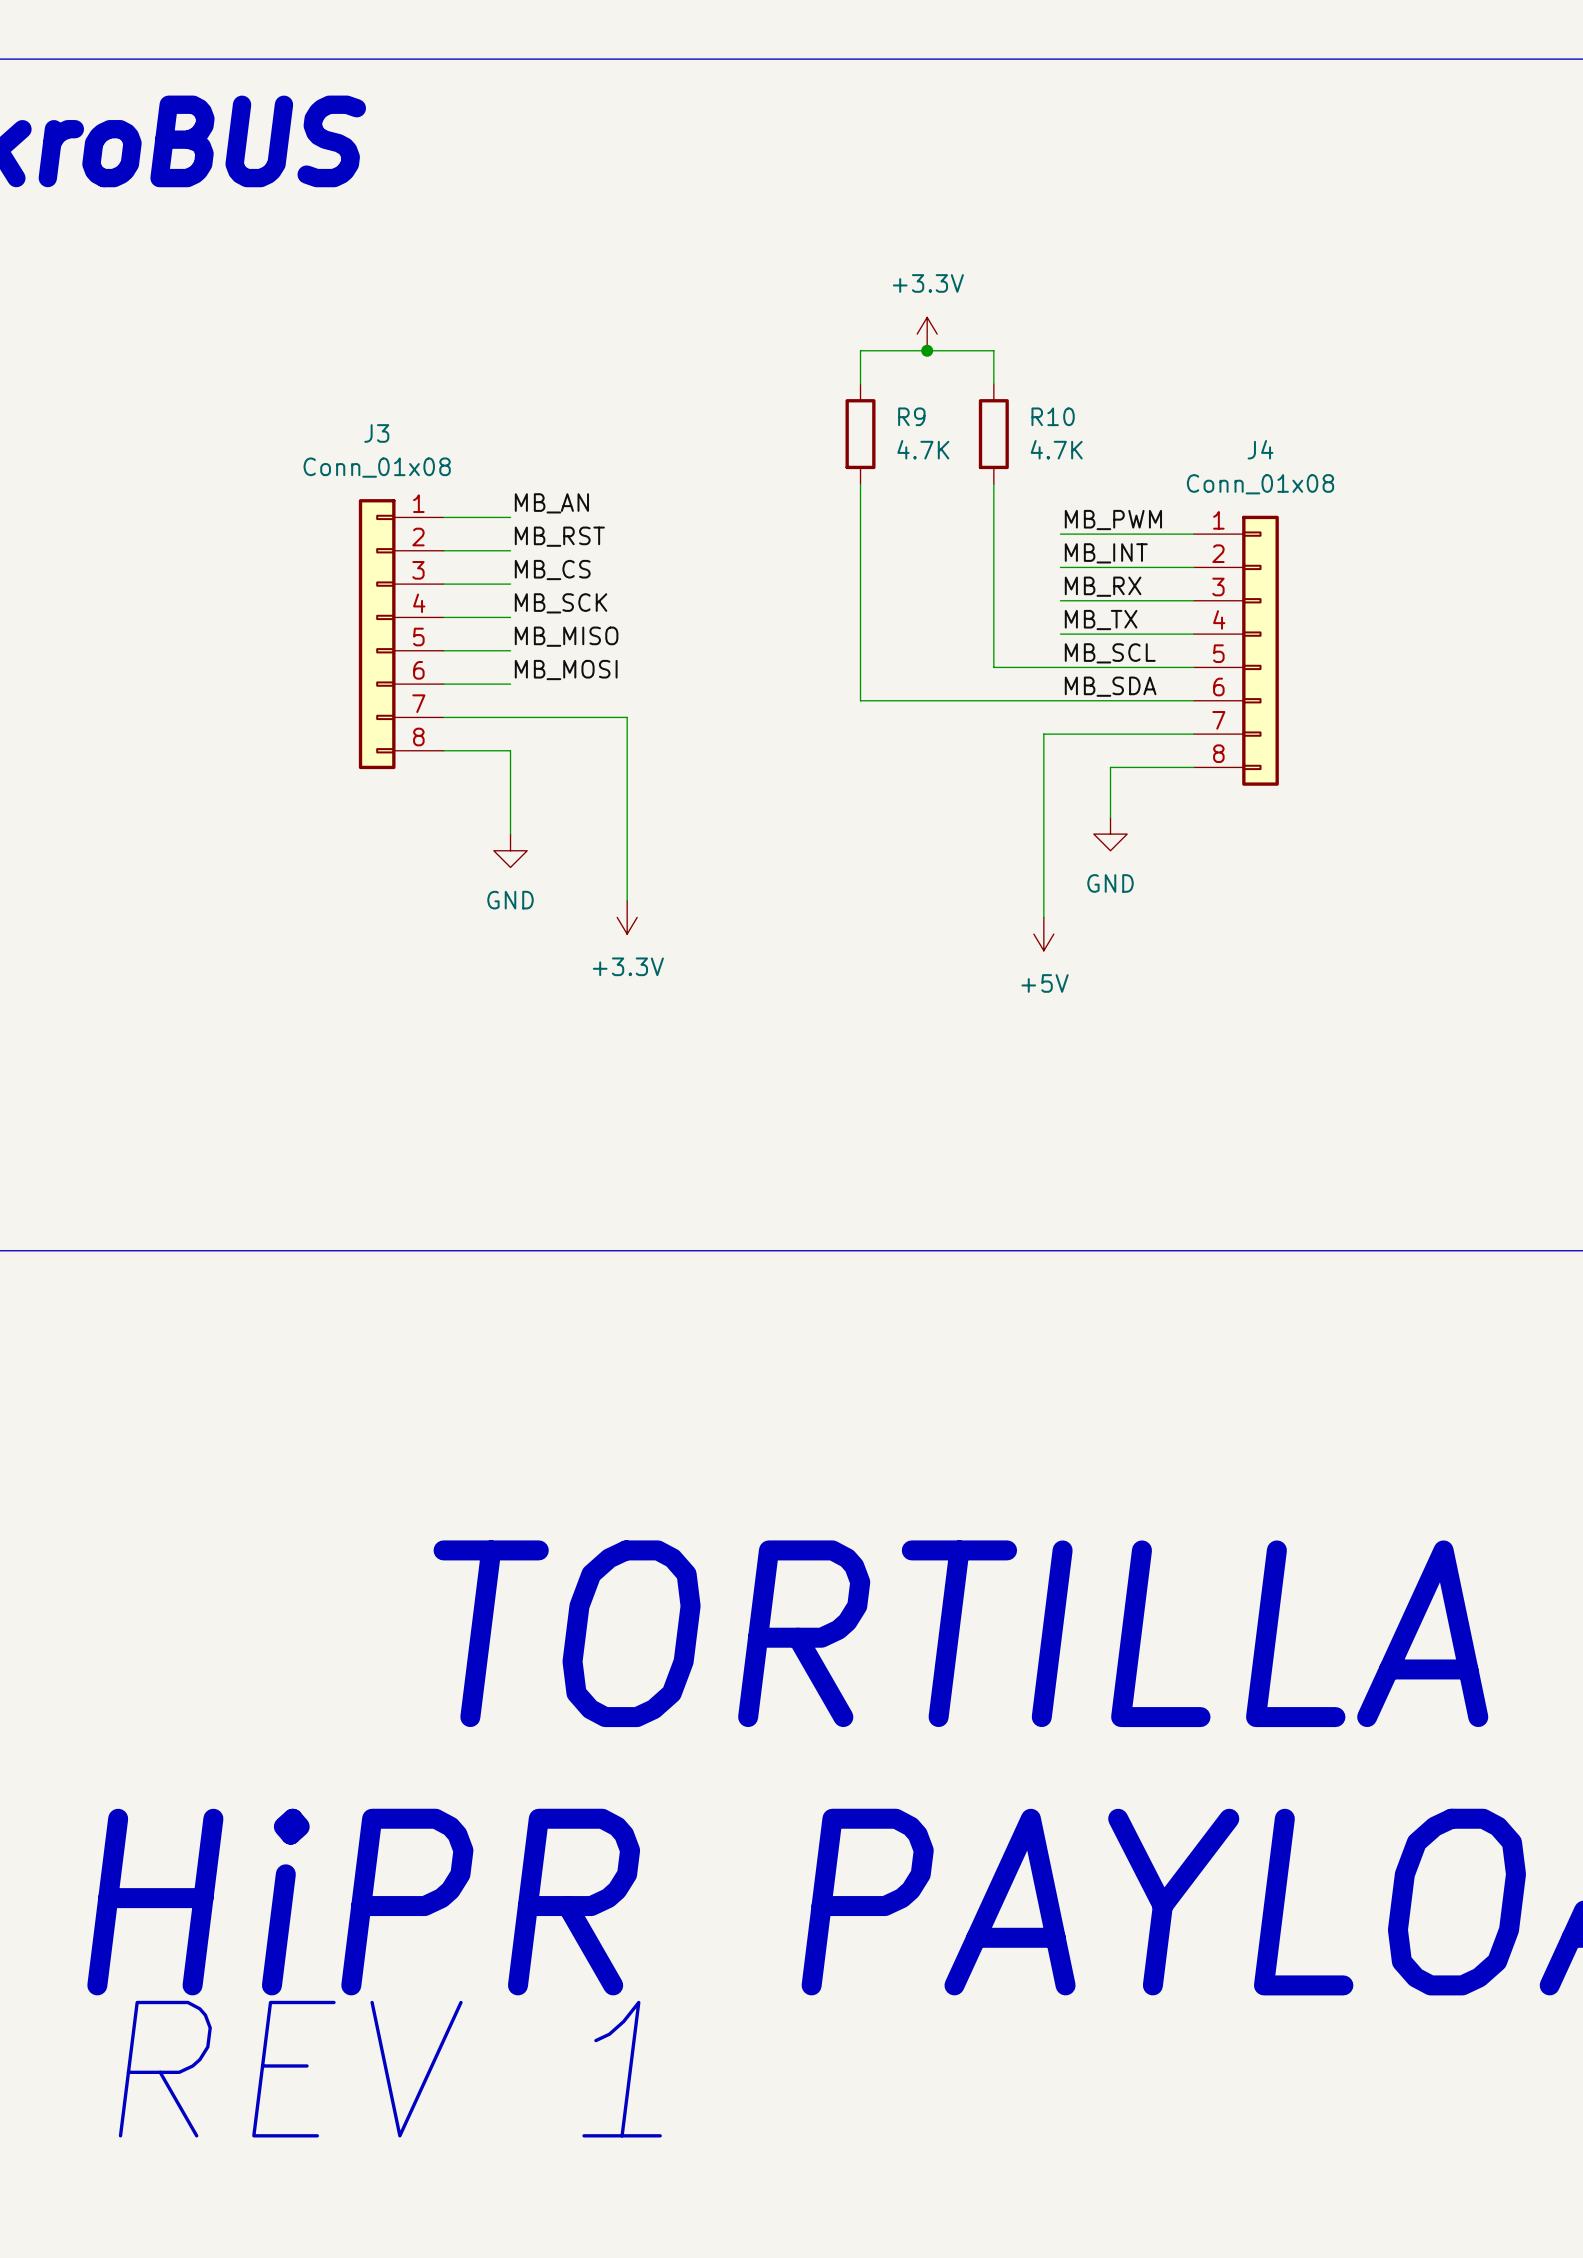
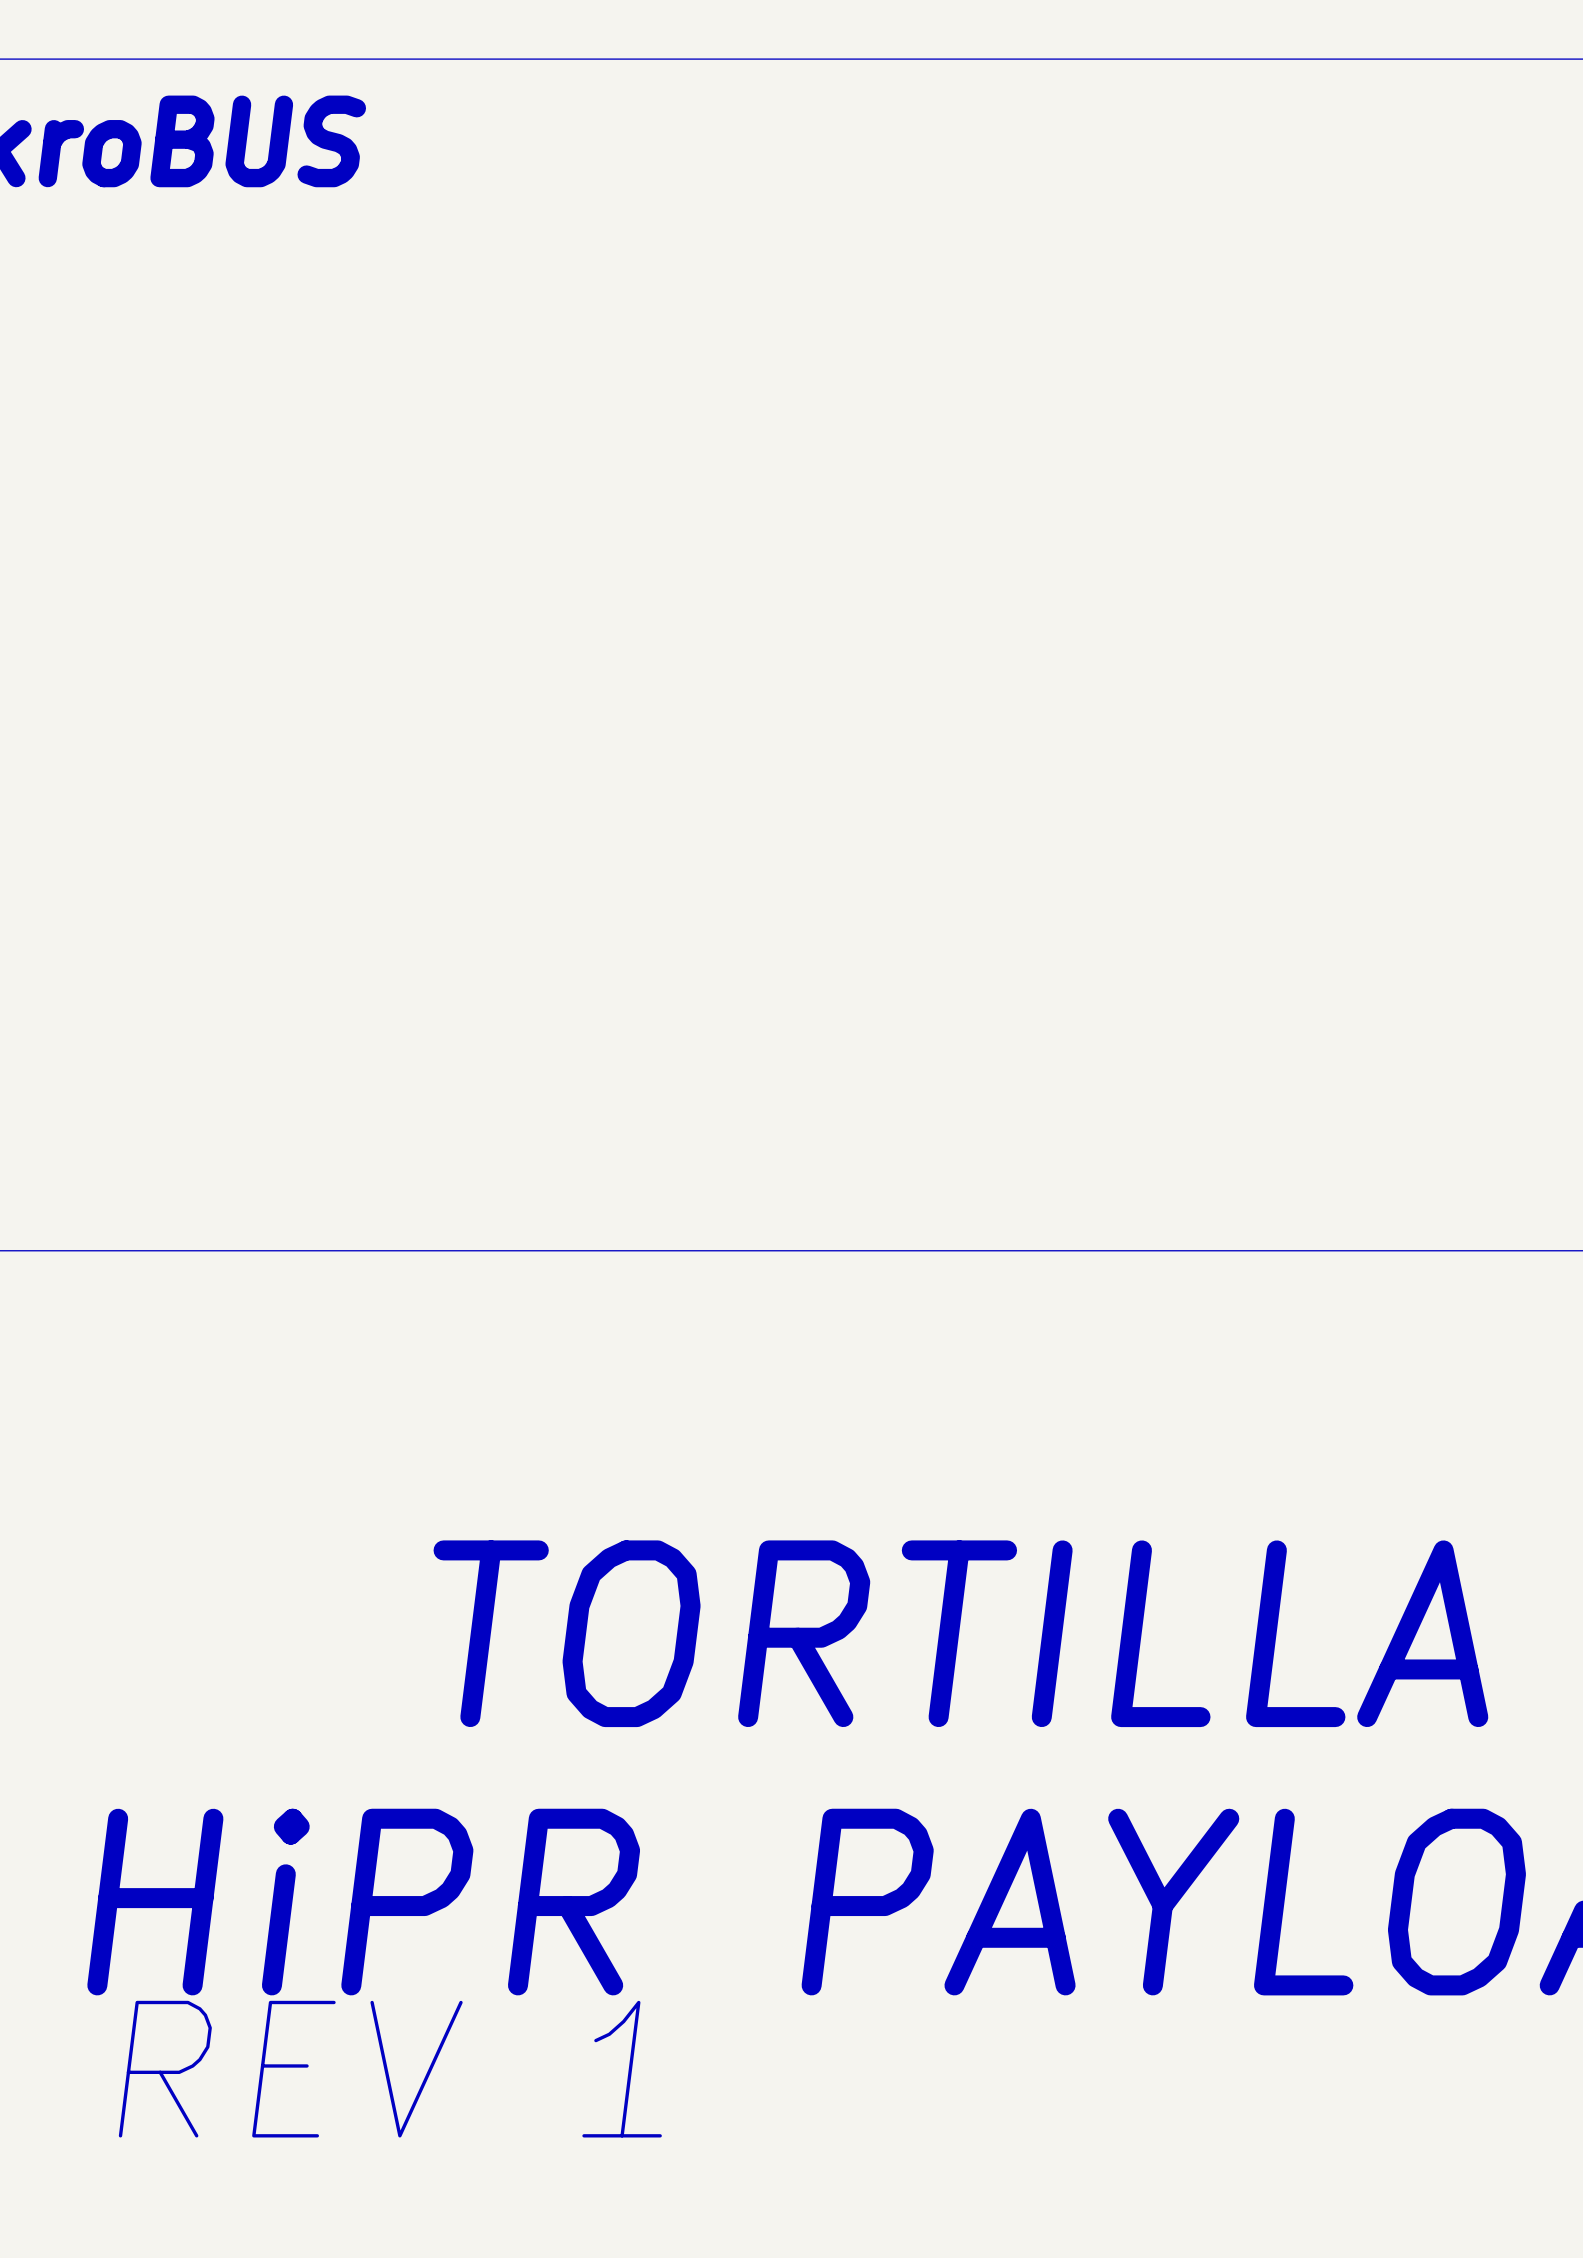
power symbol: +3.3V (927, 334) -> none
junction: (927, 350) -> none
wire: (860, 384) (860, 350) (993, 350) (993, 384) -> none
R9: 4.7K (860, 434) -> none
R10: 4.7K (993, 434) -> none
wire: (860, 484) (860, 700) (1193, 700) -> none
wire: (993, 484) (993, 667) (1193, 667) -> none
label: MB_AN (551, 503) -> none
wire: (443, 517) (510, 517) -> none
label: MB_PWM (1113, 520) -> none
wire: (1060, 534) (1193, 534) -> none
label: MB_RST (559, 536) -> none
wire: (443, 550) (510, 550) -> none
label: MB_INT (1106, 553) -> none
wire: (1060, 567) (1193, 567) -> none
label: MB_CS (552, 570) -> none
wire: (443, 584) (510, 584) -> none
label: MB_RX (1103, 586) -> none
wire: (1060, 600) (1193, 600) -> none
label: MB_SCK (561, 603) -> none
wire: (443, 617) (510, 617) -> none
label: MB_TX (1101, 620) -> none
J3: Conn_01x08 (401, 634) -> none
wire: (1060, 634) (1193, 634) -> none
label: MB_MISO (566, 636) -> none
wire: (443, 650) (510, 650) -> none
J4: Conn_01x08 (1236, 650) -> none
label: MB_SCL (1110, 653) -> none
label: MB_MOSI (566, 670) -> none
wire: (443, 684) (510, 684) -> none
label: MB_SDA (1110, 686) -> none
wire: (443, 717) (627, 717) (627, 900) -> none
wire: (1193, 734) (1043, 734) (1043, 917) -> none
wire: (443, 750) (510, 750) (510, 834) -> none
wire: (1193, 767) (1110, 767) (1110, 817) -> none
power symbol: GND (1110, 834) -> none
power symbol: GND (510, 850) -> none
power symbol: +3.3V (627, 917) -> none
power symbol: +5V (1043, 934) -> none

